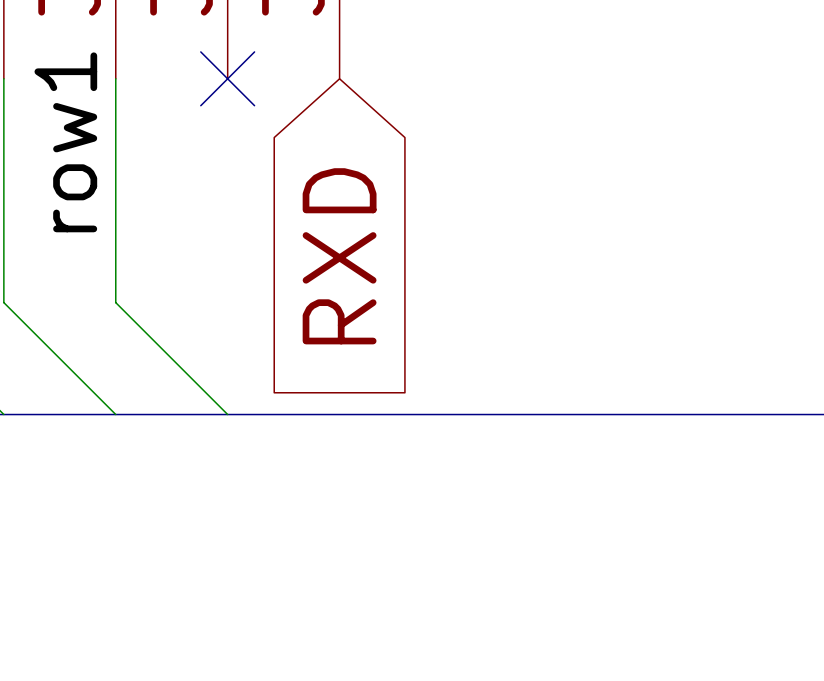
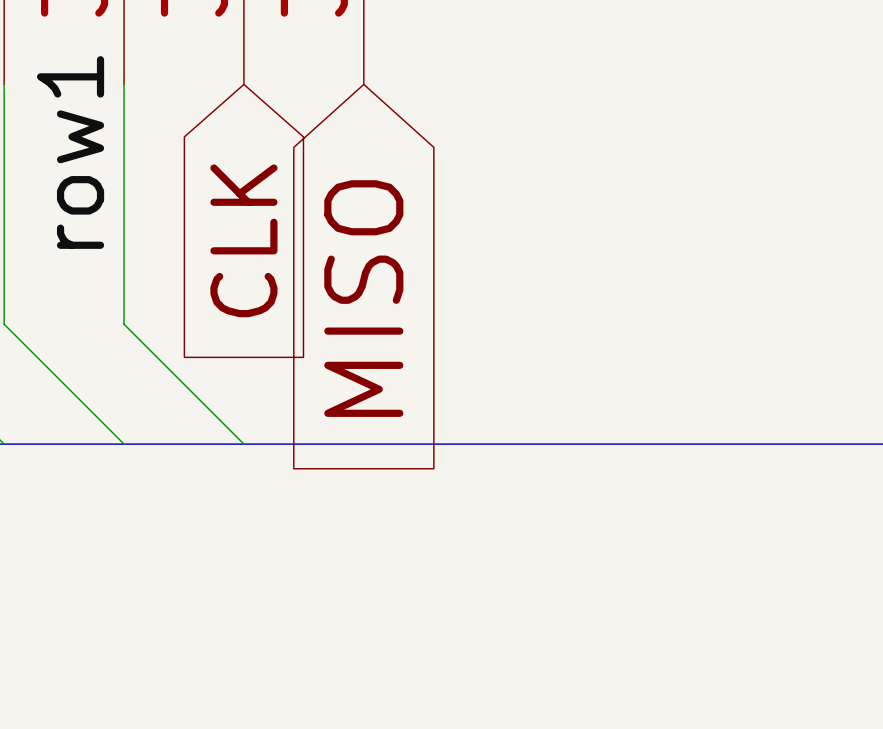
no-connect mark: (227, 78) -> none
global label: none -> CLK (243, 240)
global label: RXD (339, 256) -> MISO (363, 298)

